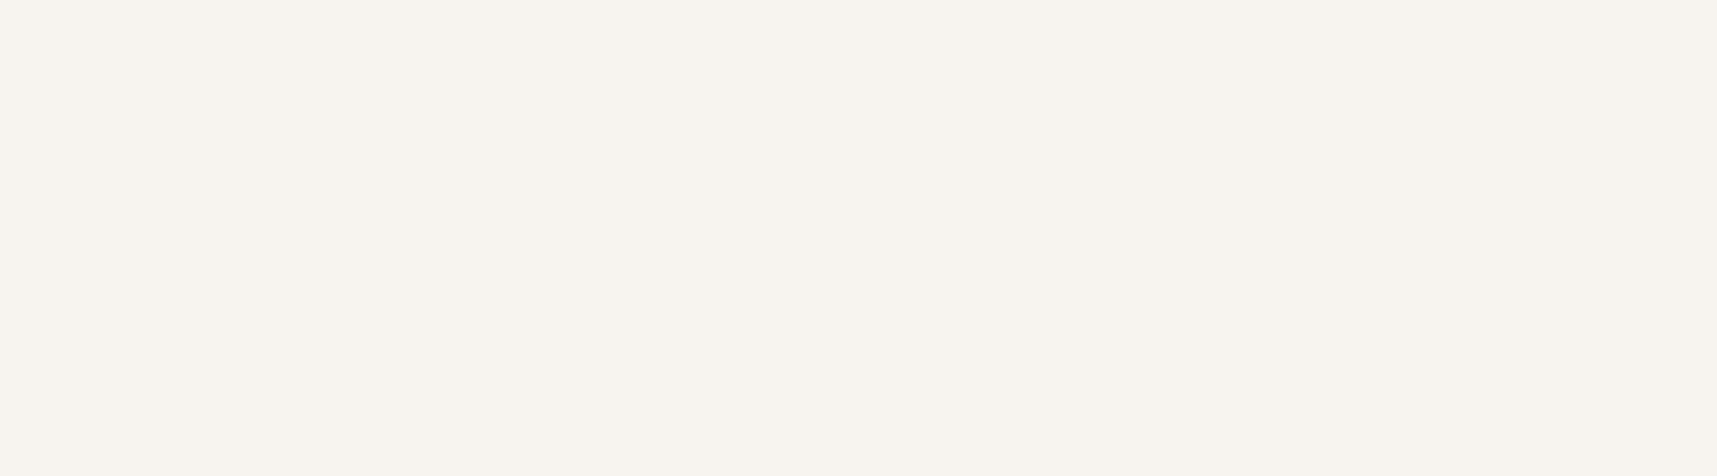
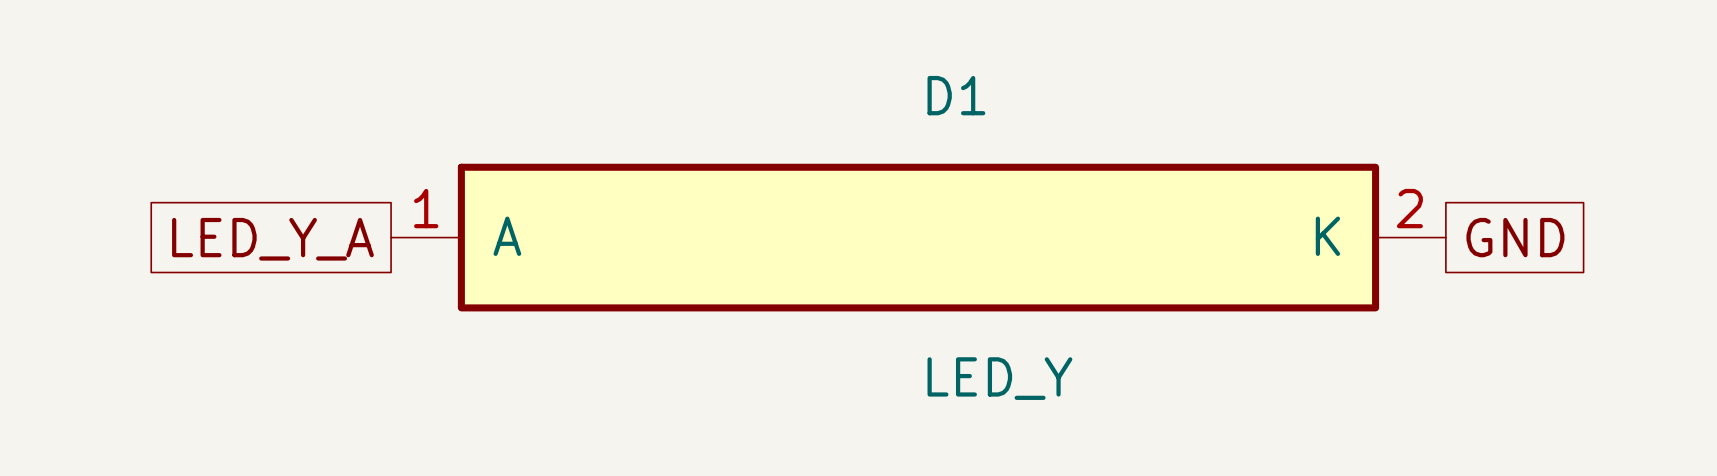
D1: none -> LED_Y (918, 237)
global label: none -> GND (1515, 237)
global label: none -> LED_Y_A (272, 239)

